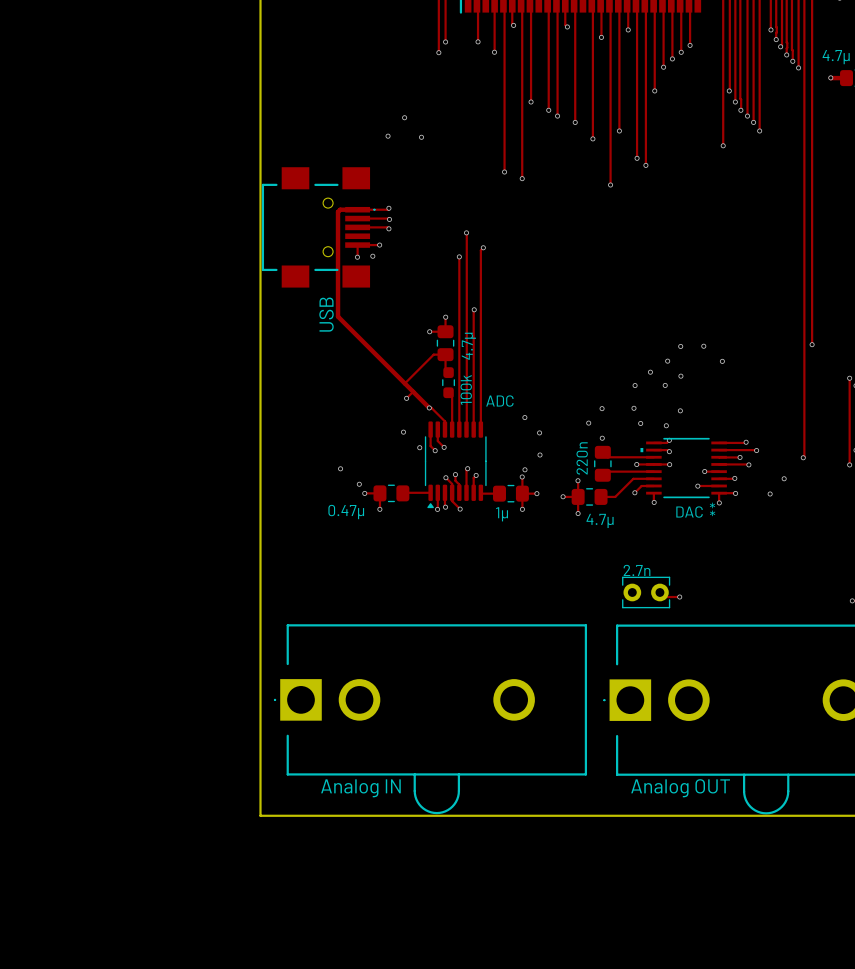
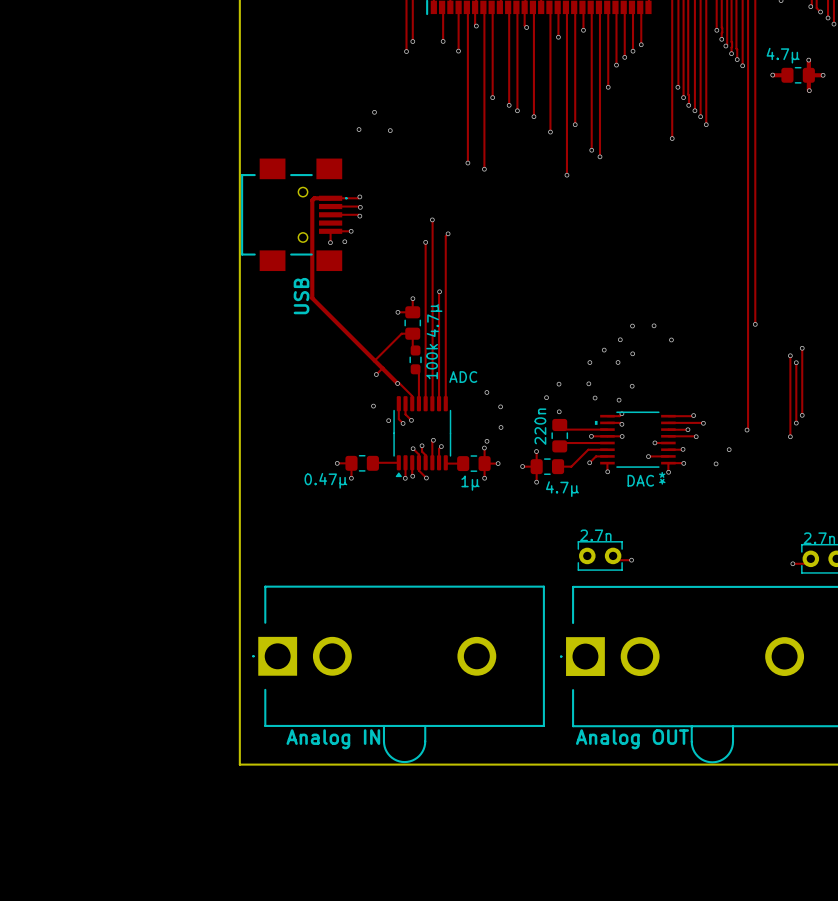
via: (340, 468) -> none
via: (359, 484) -> none

